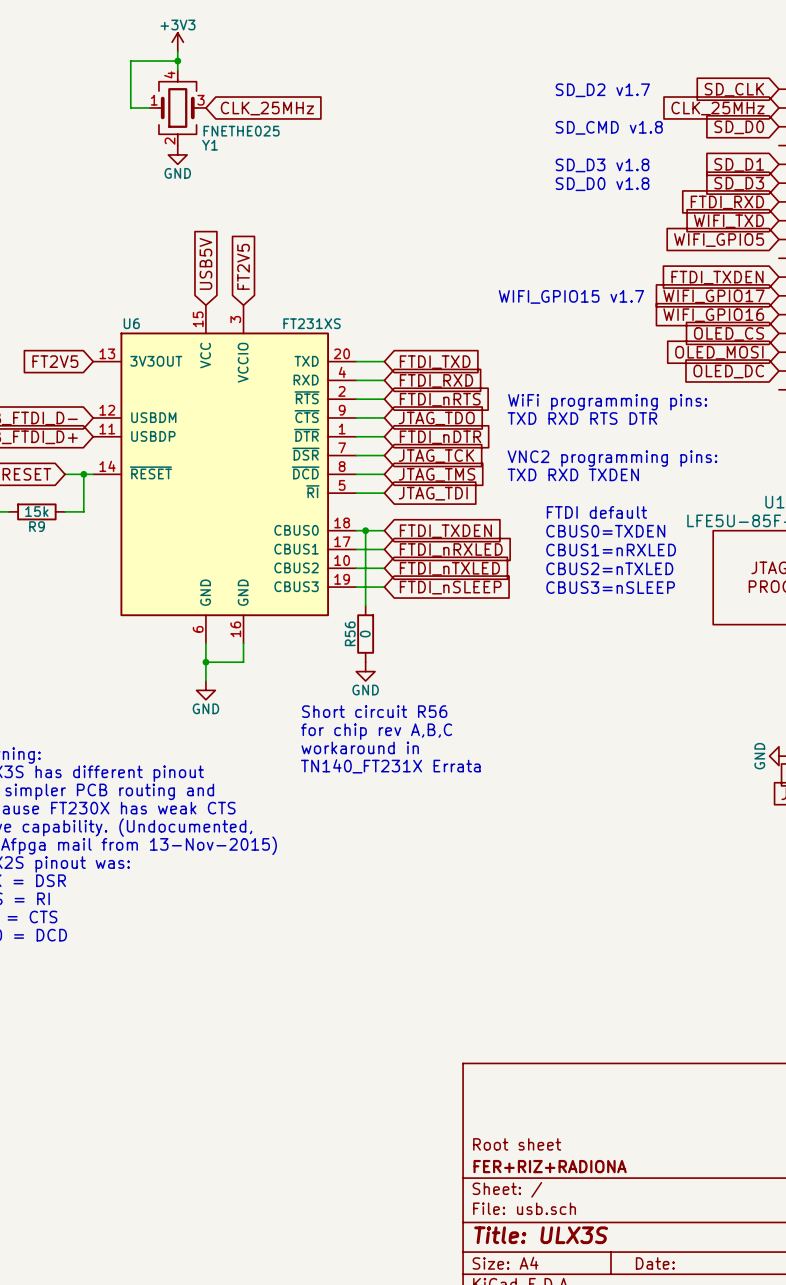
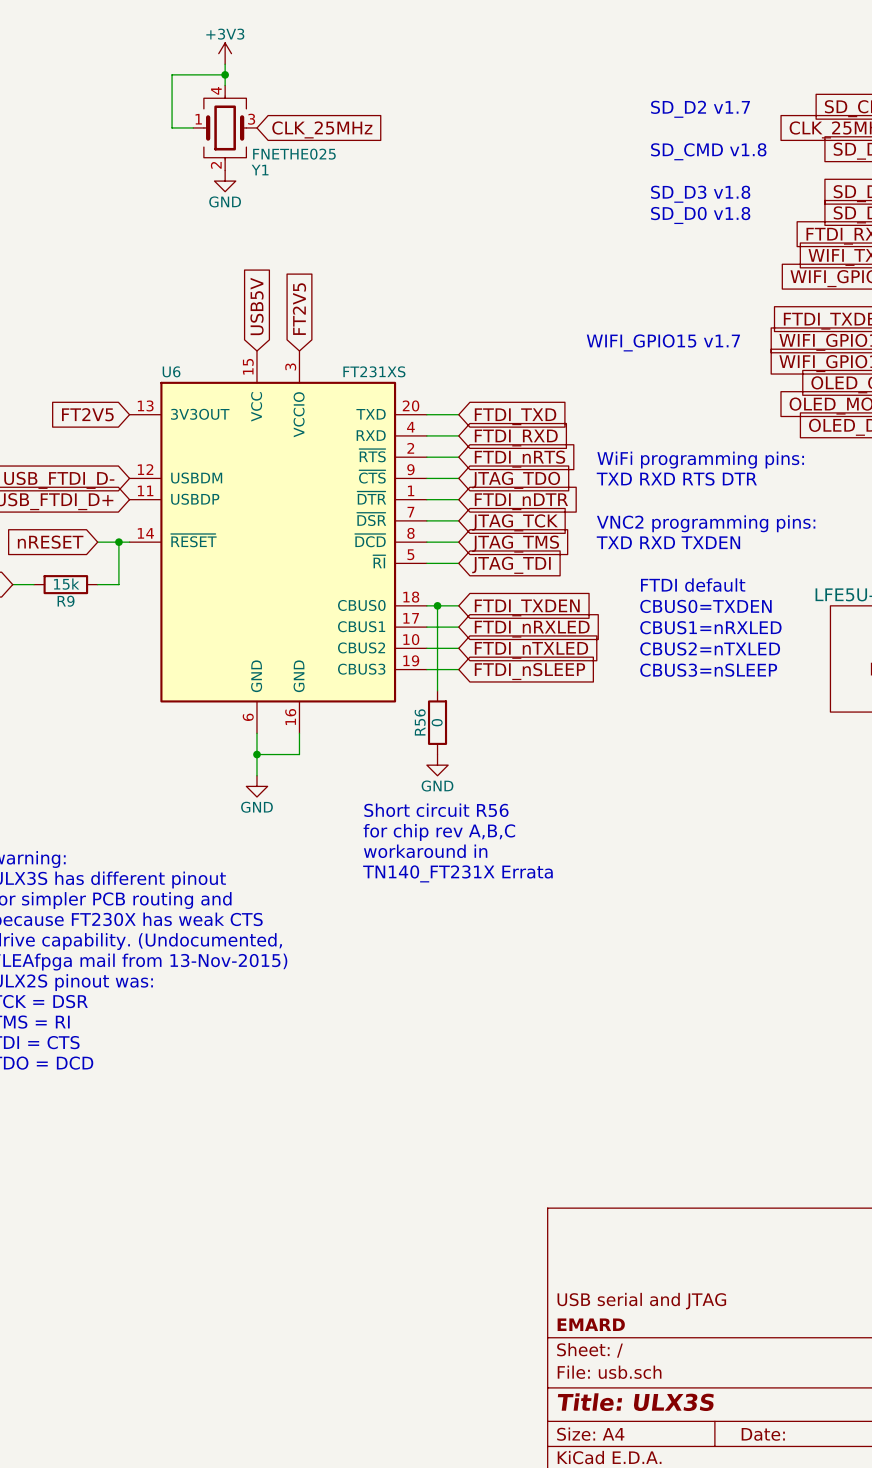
title block: Root sheet (517, 1144) -> USB serial and JTAG (641, 1301)
title block: FER+RIZ+RADIONA (550, 1166) -> EMARD (591, 1324)

